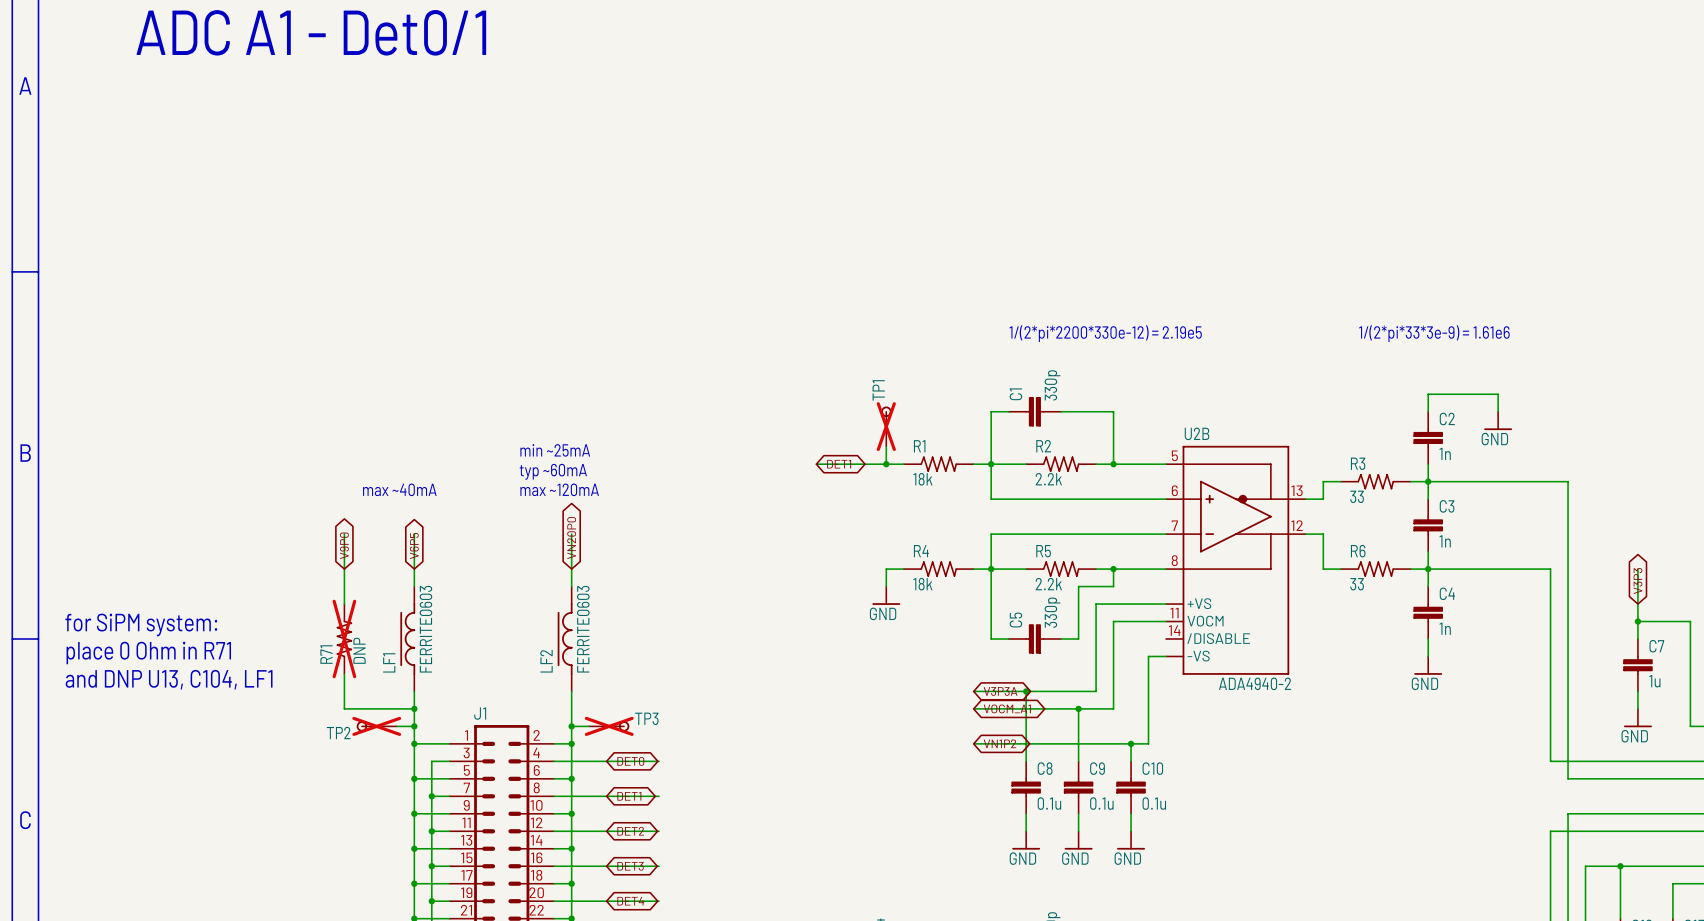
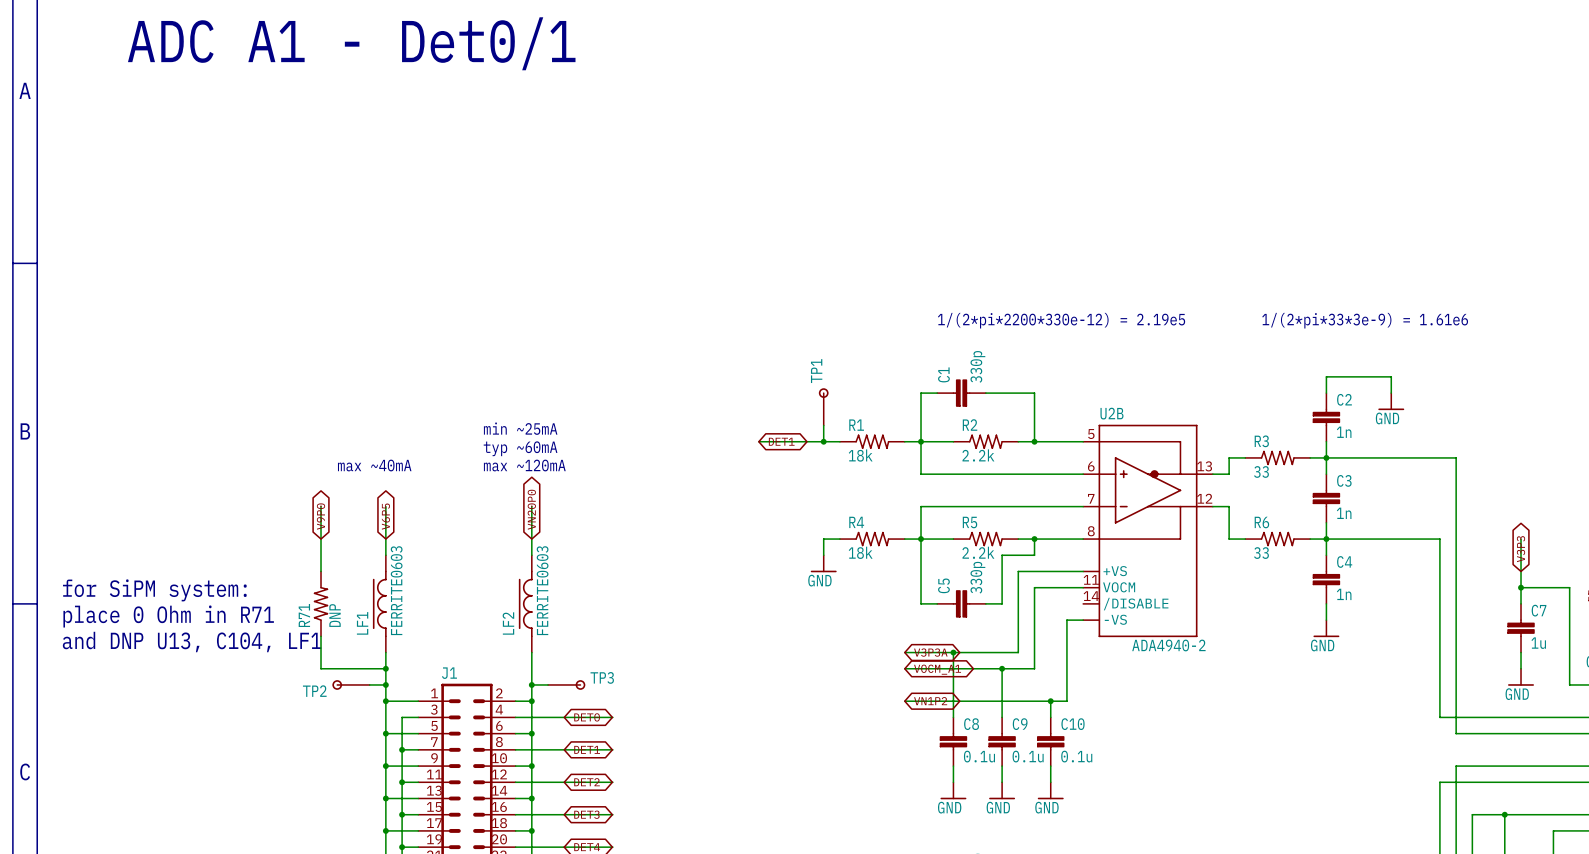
TP1 do-not-place cross: (886, 426) -> none
R71 do-not-place cross: (344, 638) -> none
TP2 do-not-place cross: (376, 726) -> none
TP3 do-not-place cross: (609, 726) -> none

